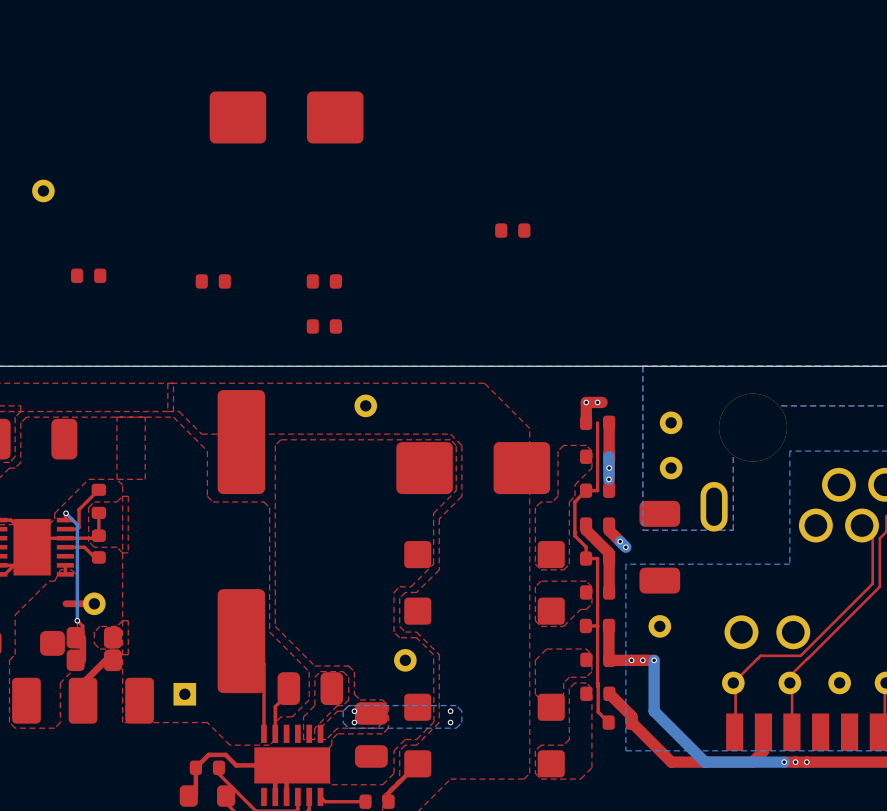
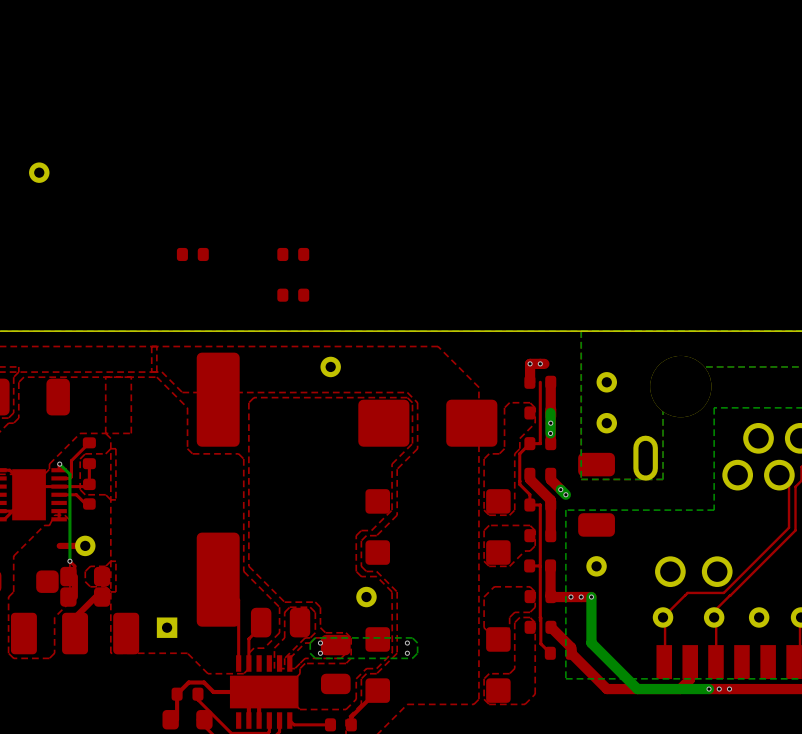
part: (286, 117) -> none
part: (512, 230) -> none
part: (88, 275) -> none

